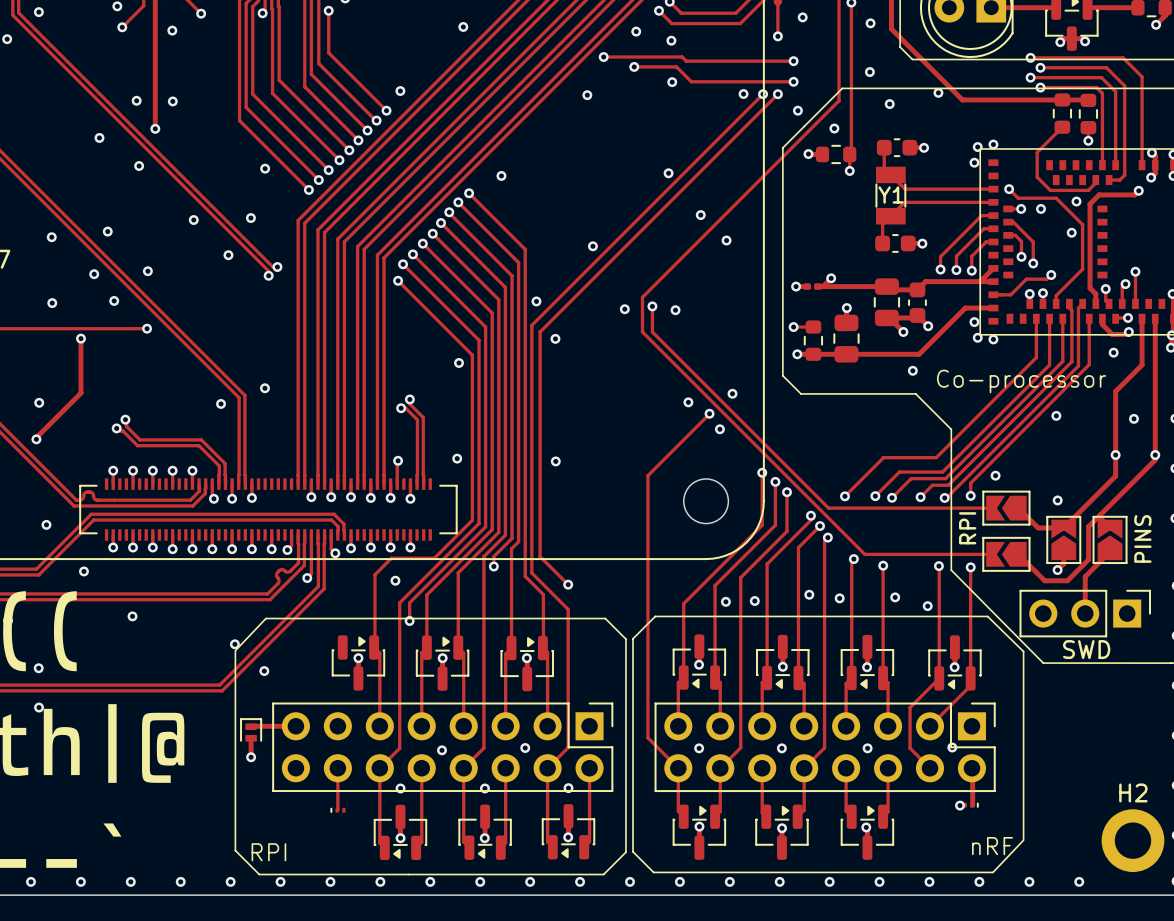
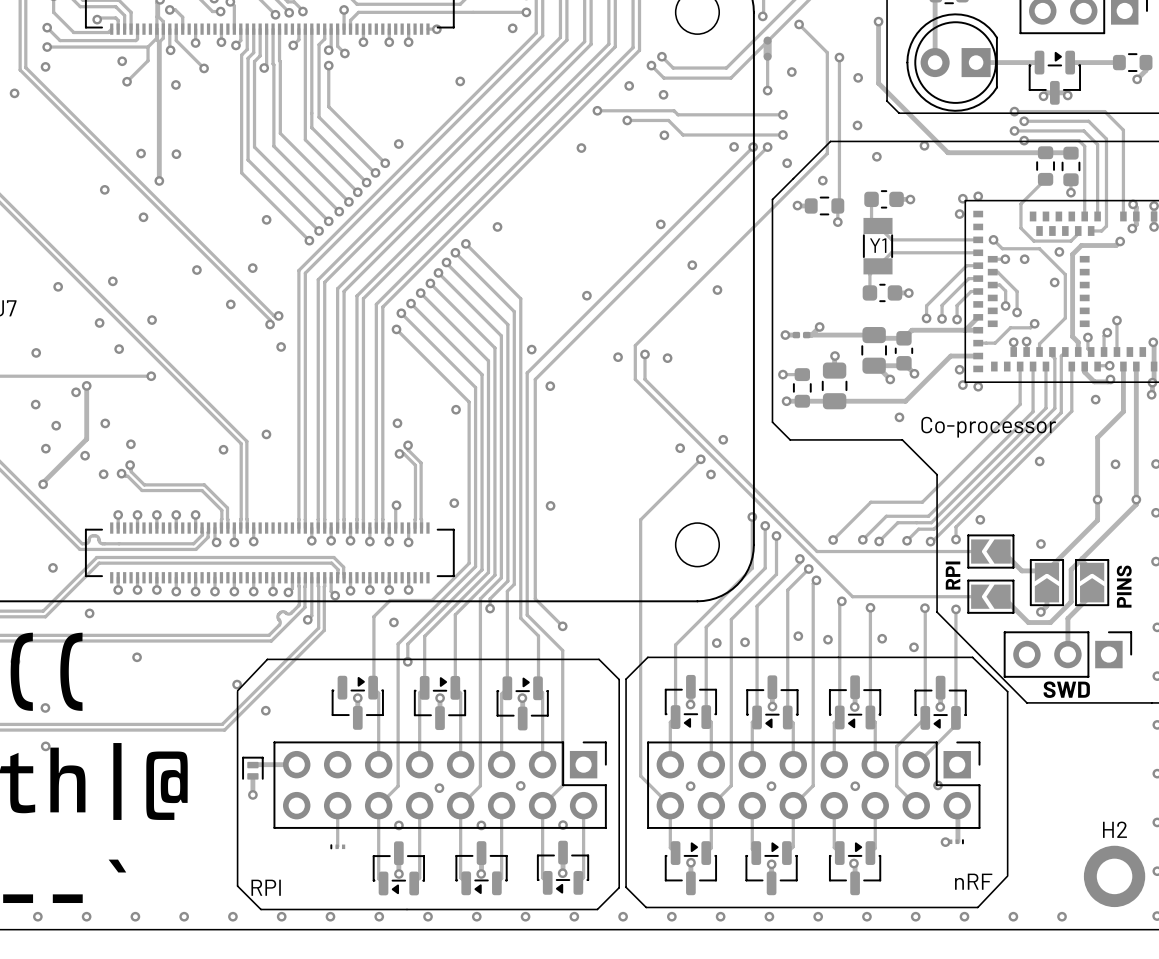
via: none -> (281, 346)
via: (52, 303) -> none
via: none -> (36, 352)
via: none -> (76, 392)
via: none -> (35, 404)
via: none -> (397, 423)
via: none -> (105, 423)
via: none -> (56, 425)
via: none -> (130, 444)
via: none -> (85, 455)
via: none -> (103, 474)

